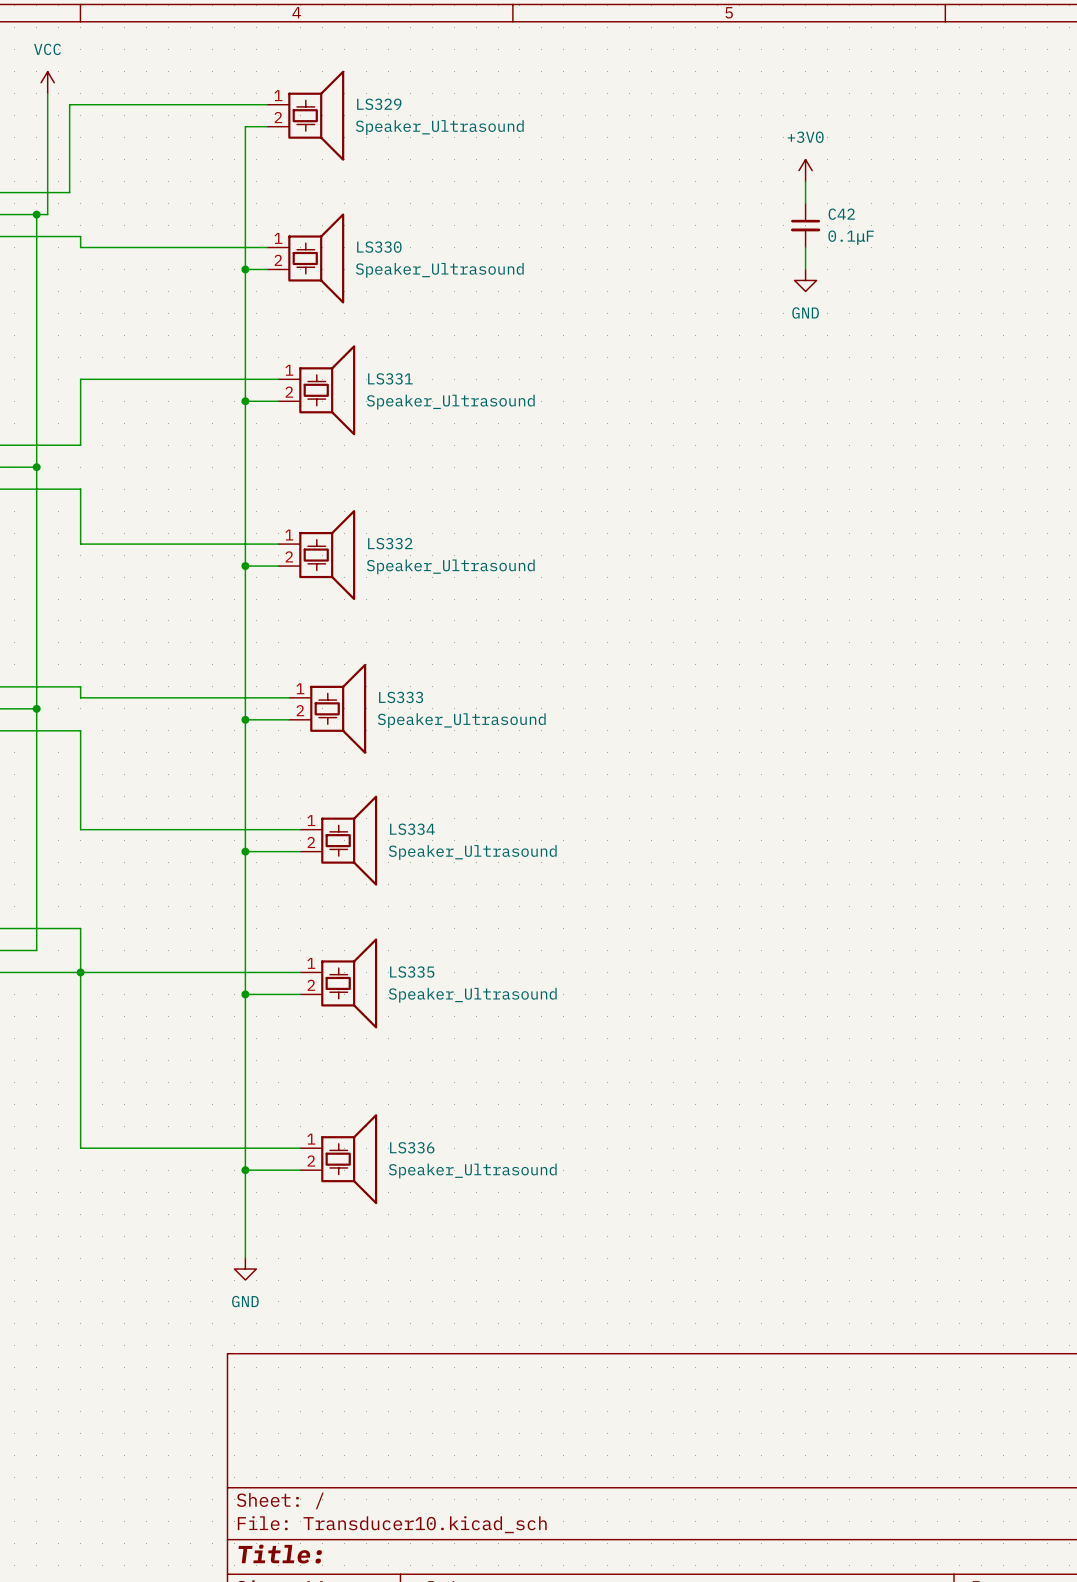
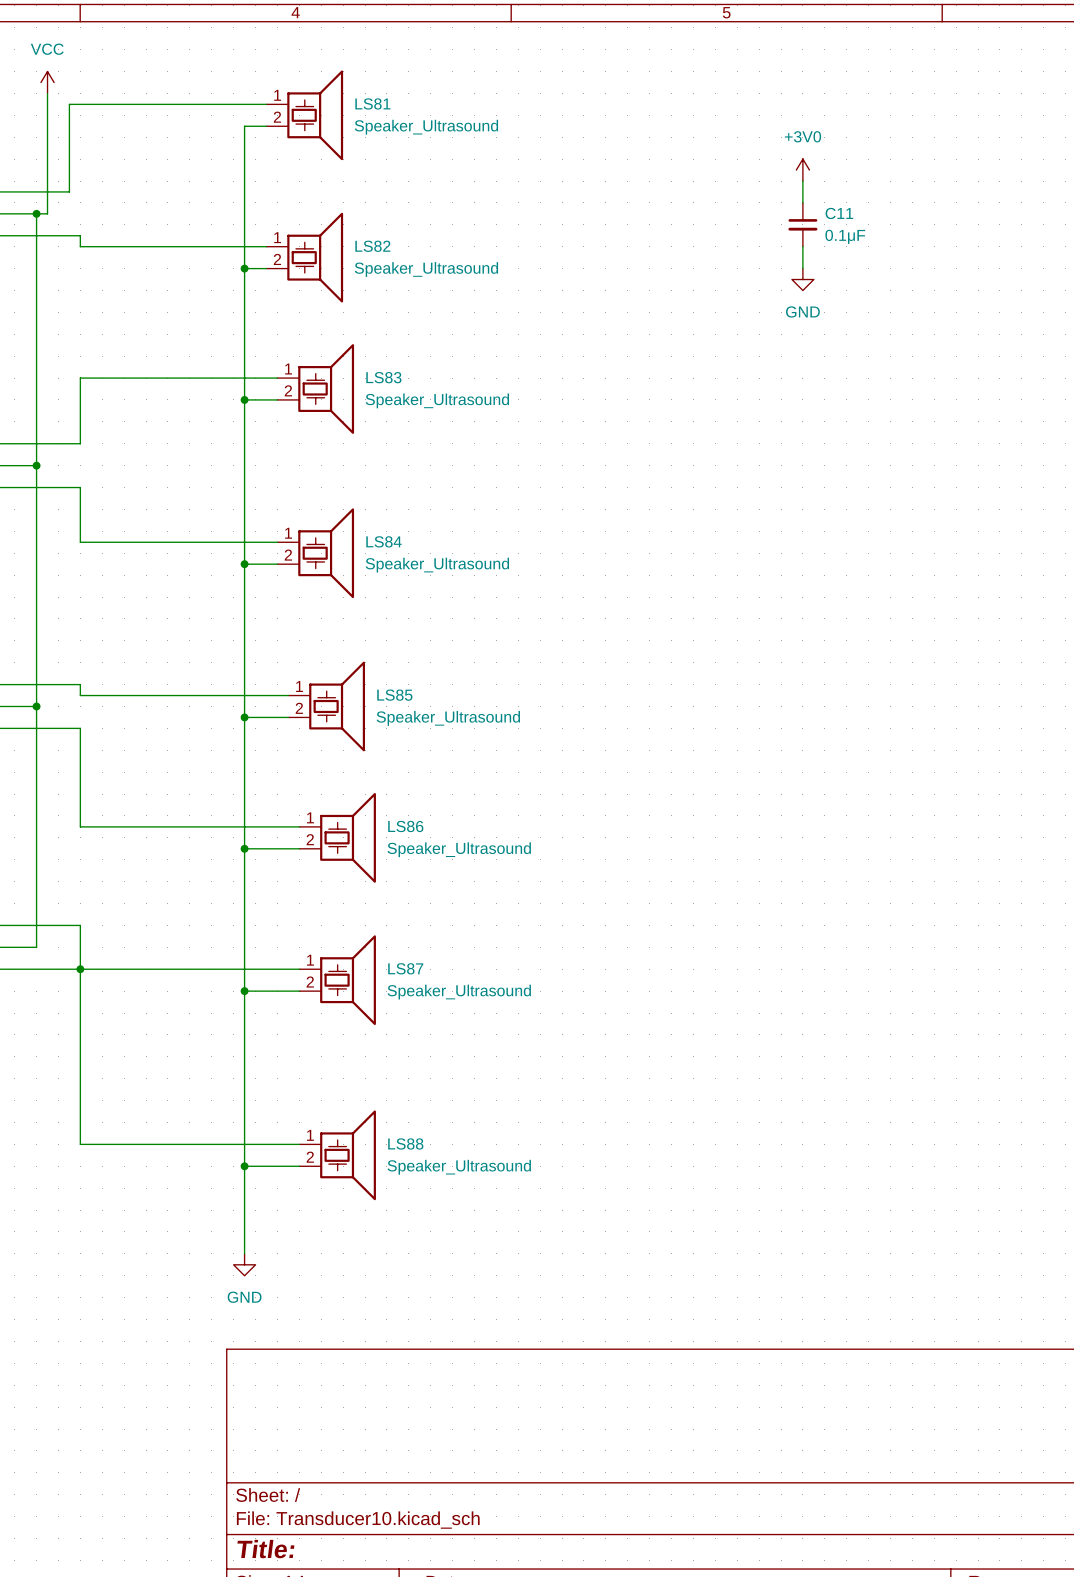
LS329 name: LS329 (379, 104) -> LS81 (372, 103)
C42 name: C42 (841, 214) -> C11 (839, 213)
LS330 name: LS330 (379, 247) -> LS82 (372, 246)
LS331 name: LS331 (390, 378) -> LS83 (383, 377)
LS332 name: LS332 (390, 543) -> LS84 (384, 541)
LS333 name: LS333 (401, 697) -> LS85 (394, 695)
LS334 name: LS334 (412, 829) -> LS86 (405, 826)
LS335 name: LS335 (412, 972) -> LS87 (405, 968)
LS336 name: LS336 (412, 1147) -> LS88 (405, 1143)

